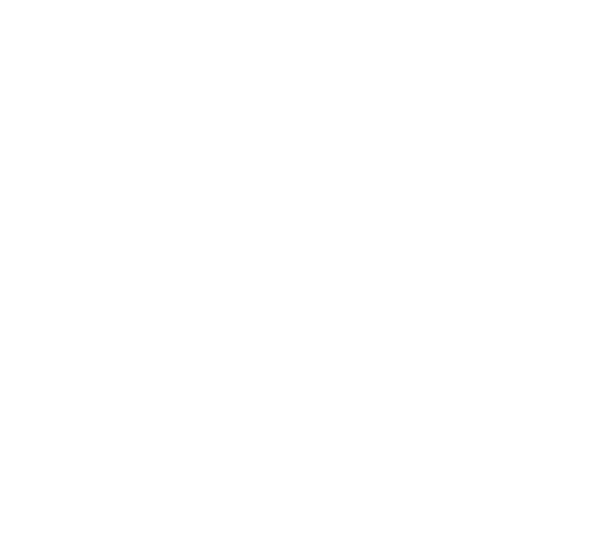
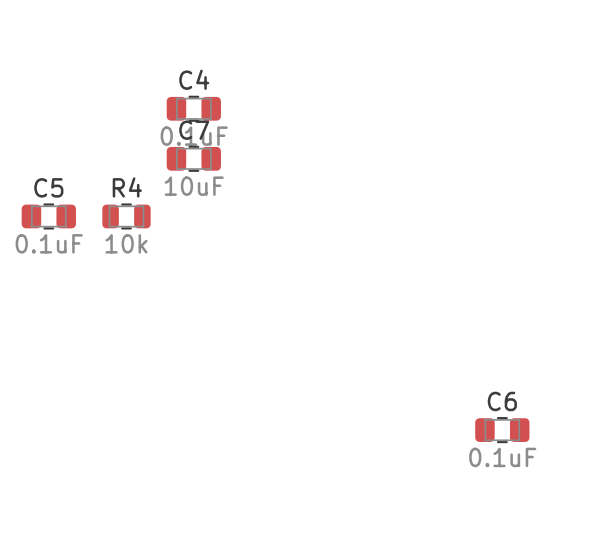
C4: none -> 0.1uF (193, 108)
C7: none -> 10uF (193, 158)
C5: none -> 0.1uF (48, 216)
R4: none -> 10k (126, 216)
C6: none -> 0.1uF (502, 430)

